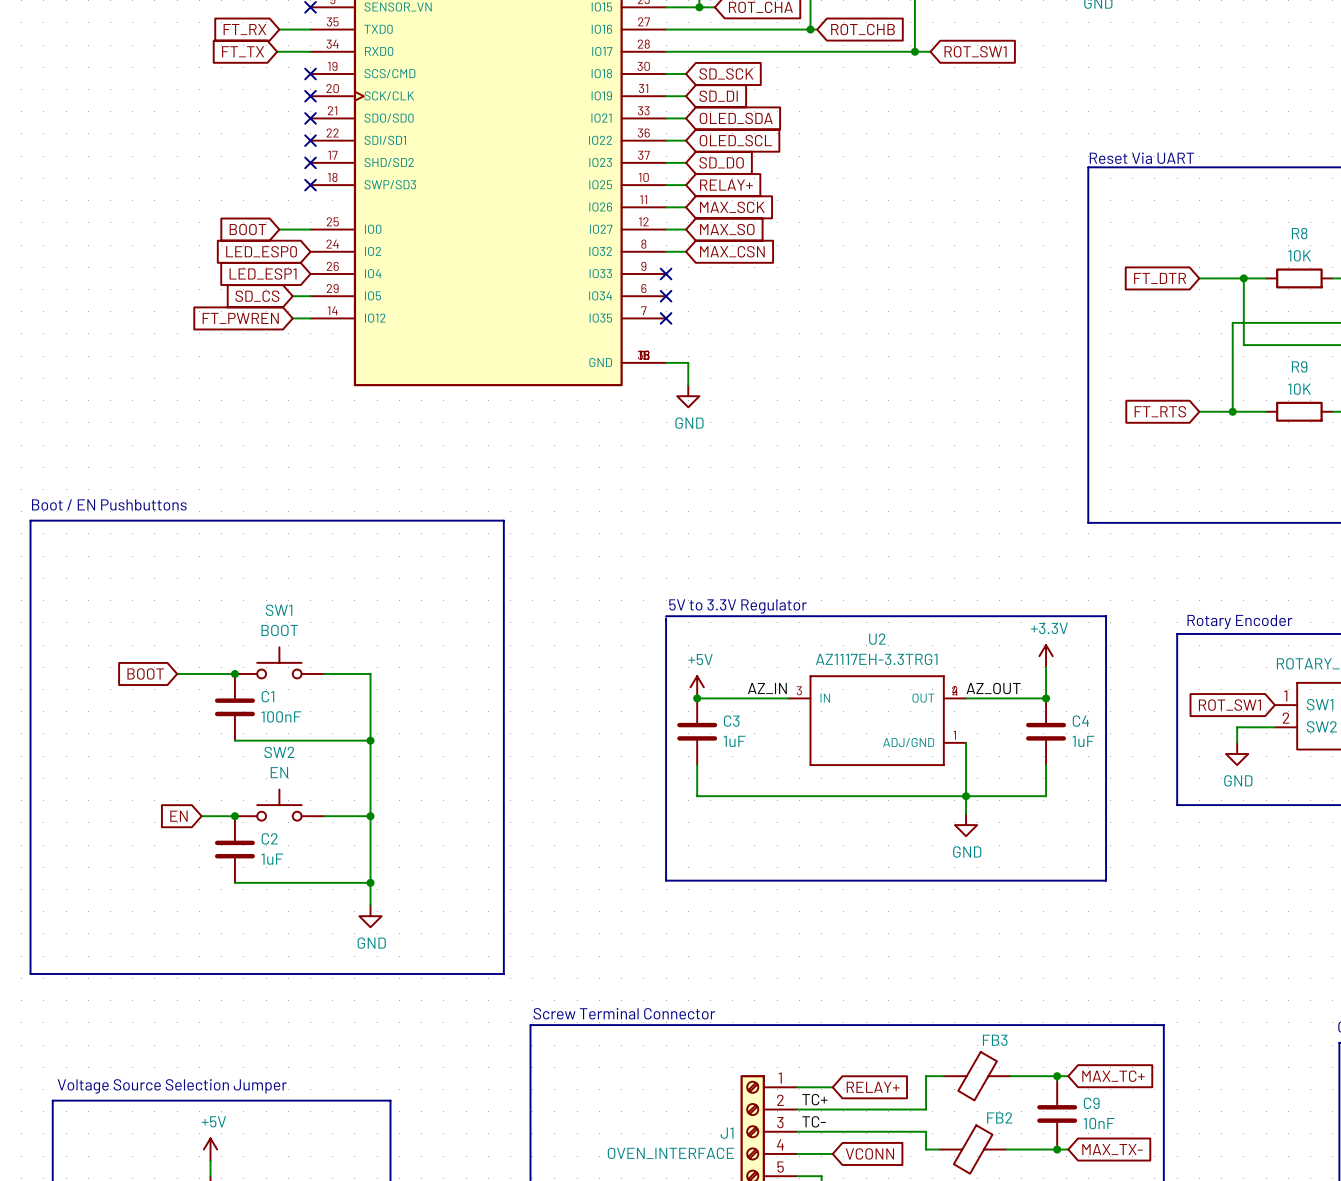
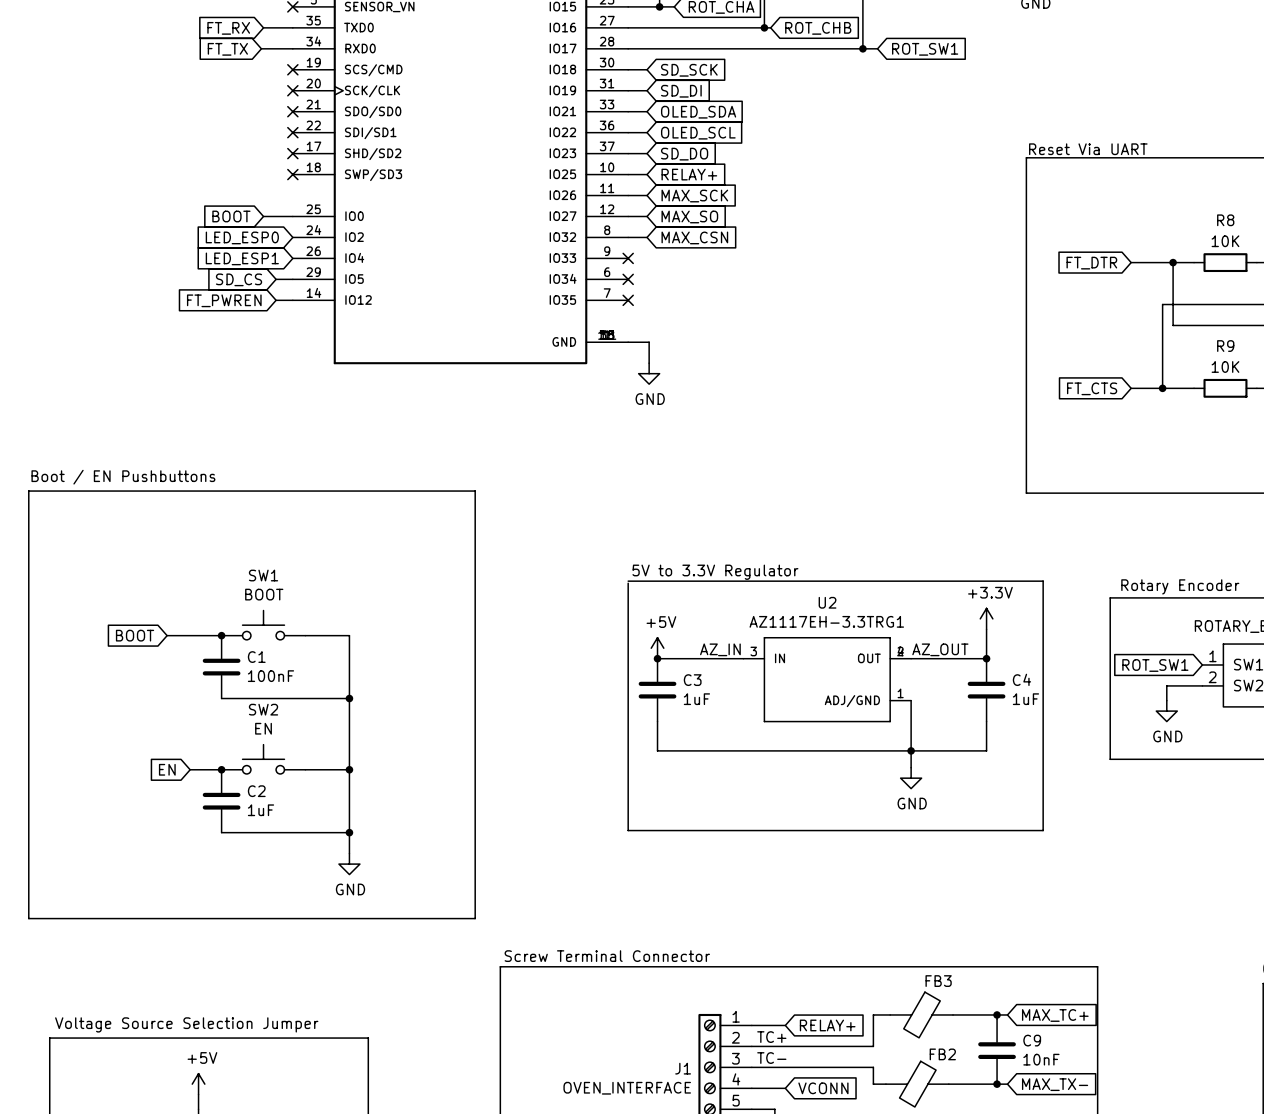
global label: FT_RTS (1160, 411) -> FT_CTS (1092, 388)

